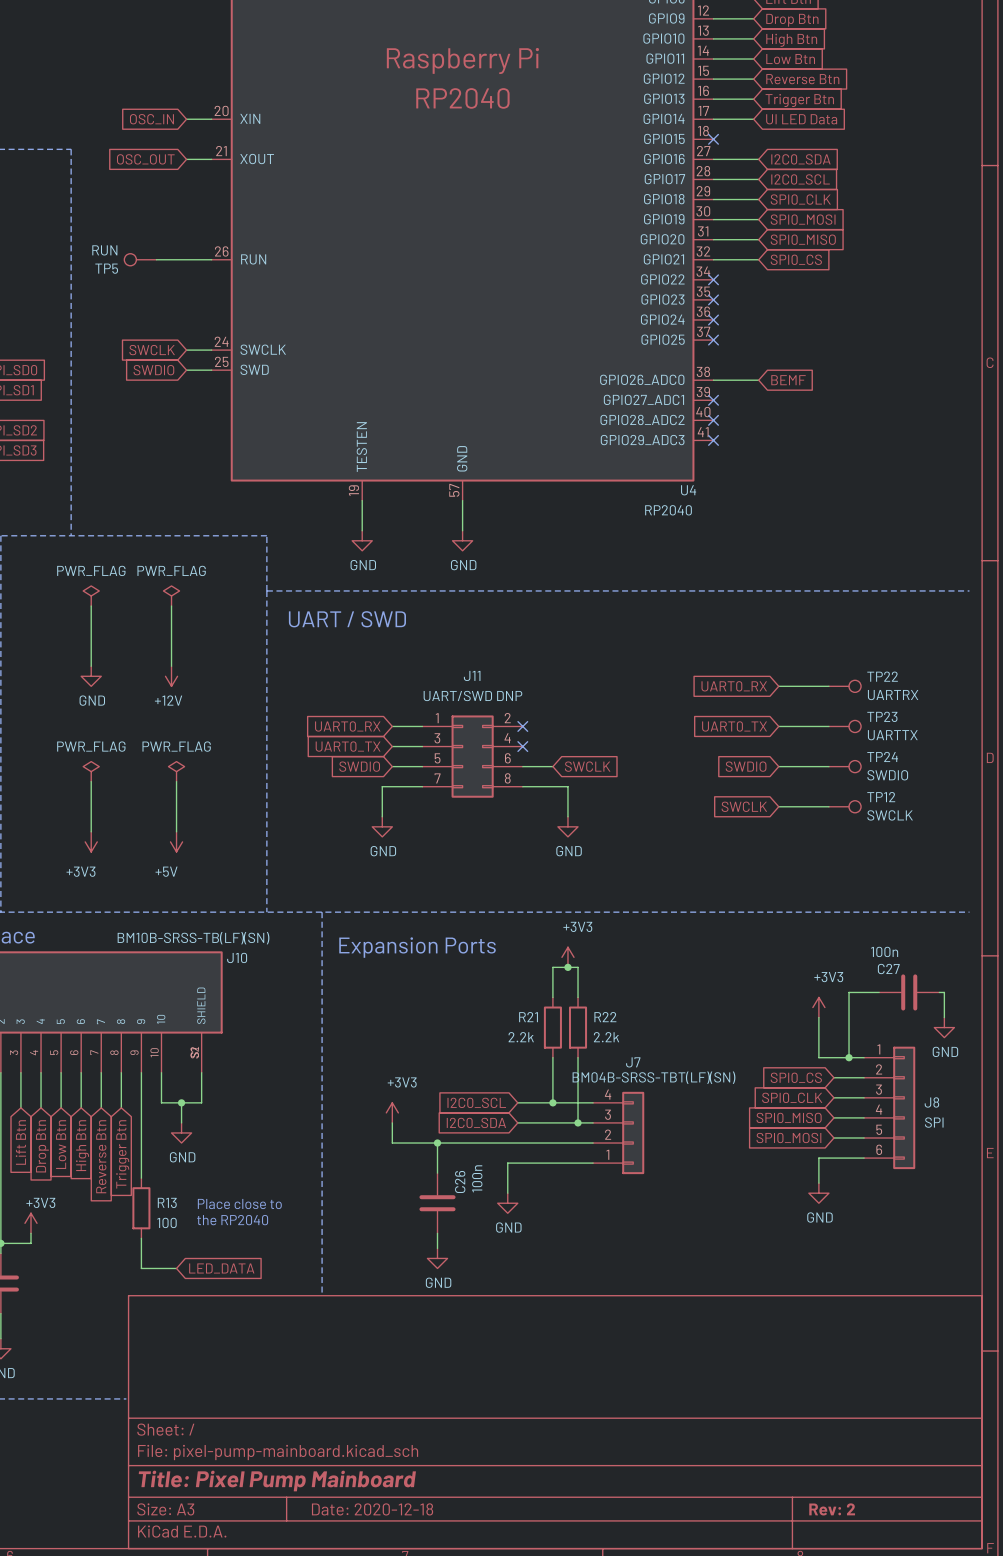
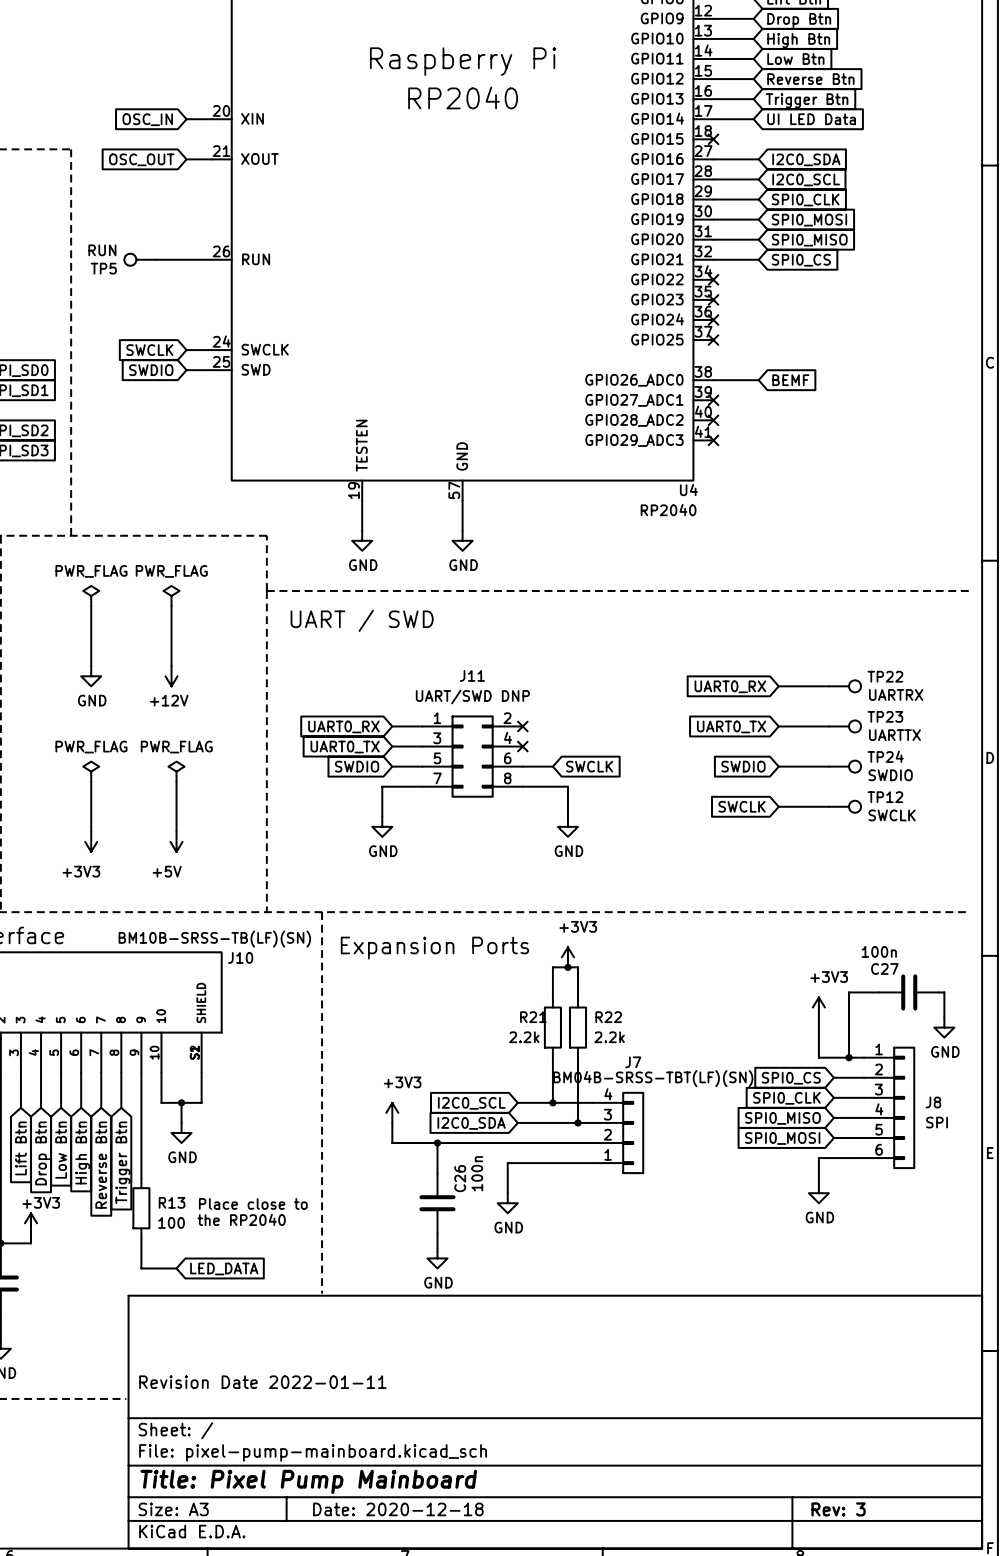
title block: none -> Revision Date 2022-01-11 (262, 1382)
title block: Rev: 2 (832, 1509) -> Rev: 3 (838, 1509)

